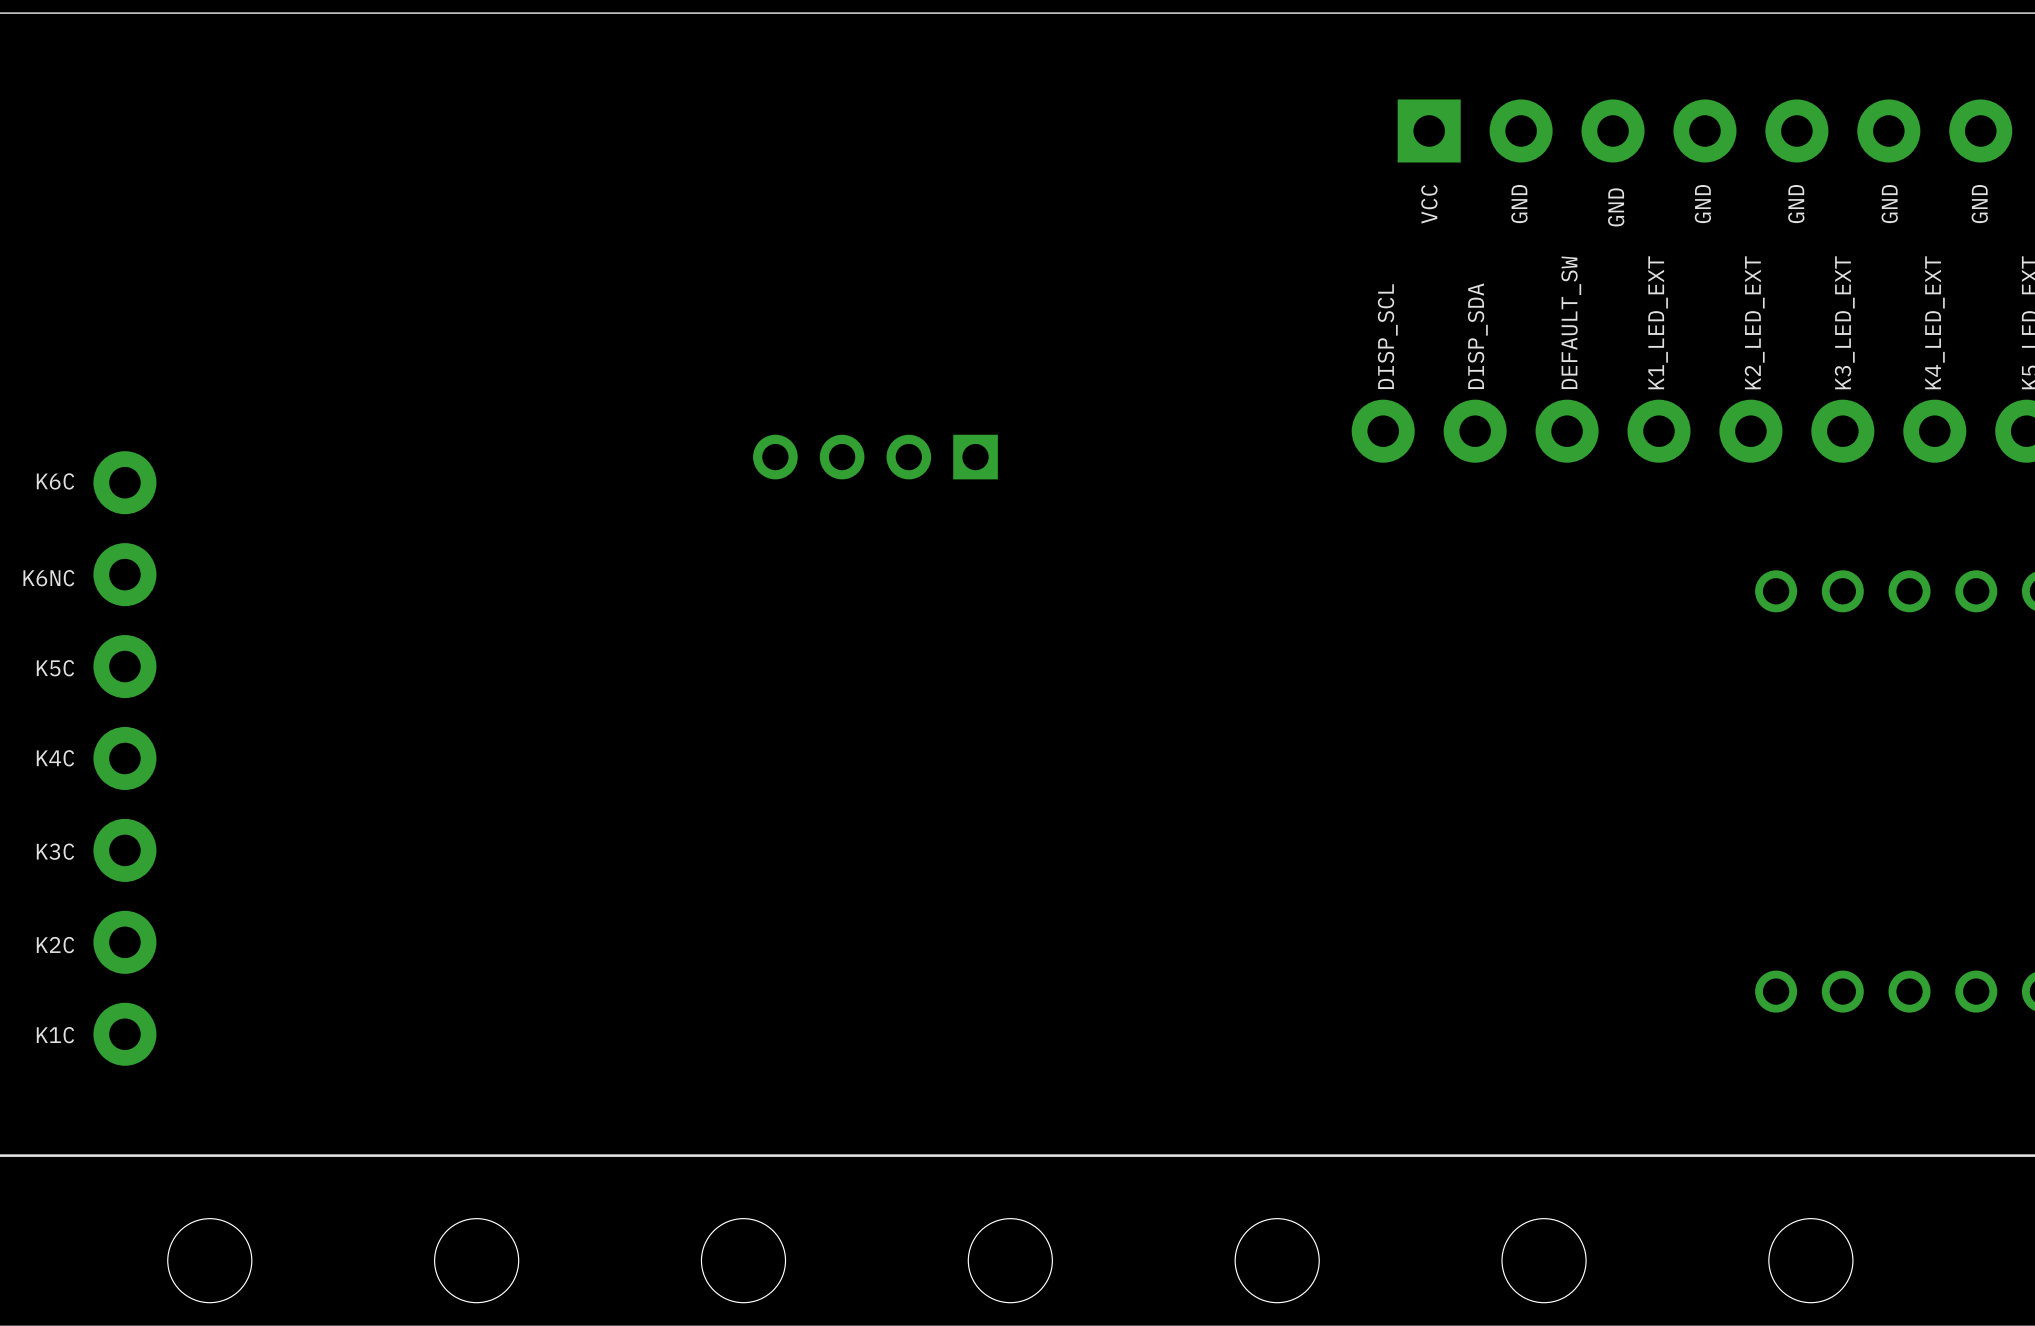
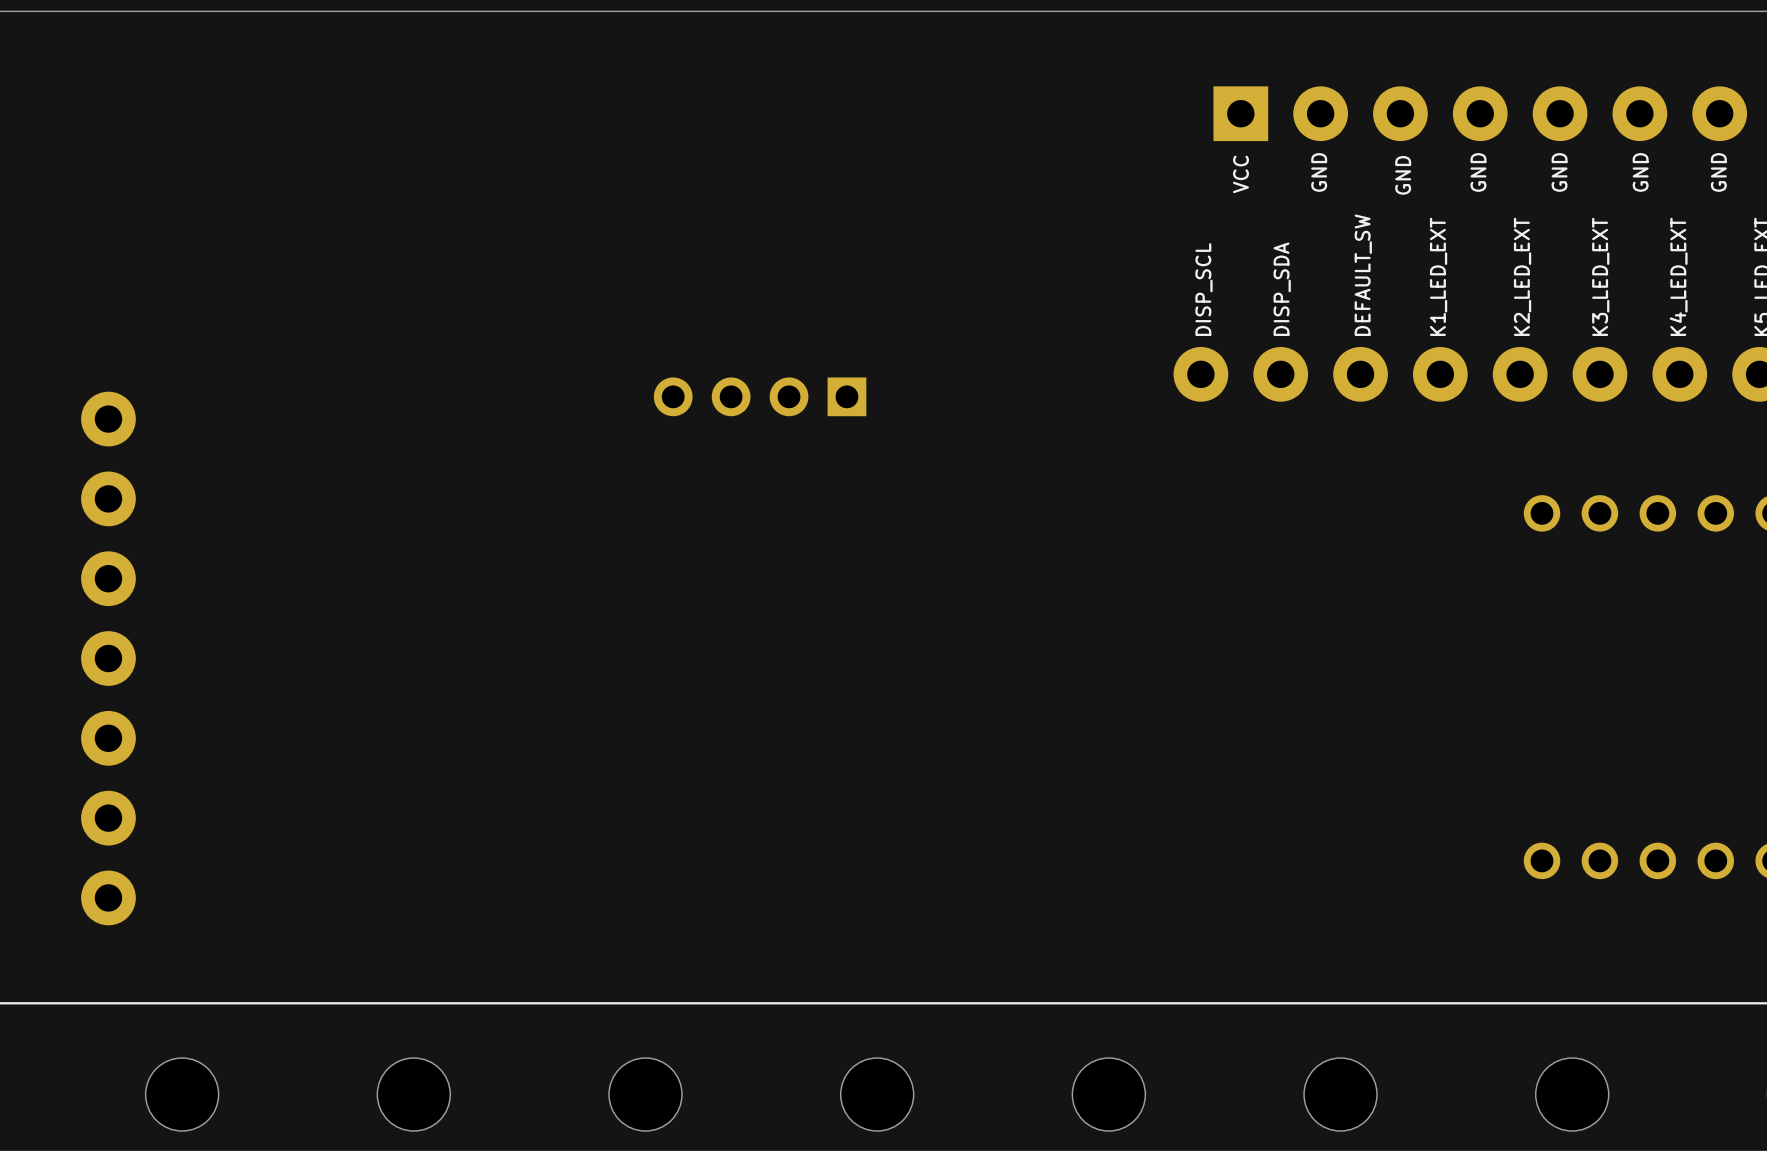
text: K6C (55, 481) -> none
text: K6NC (48, 578) -> none
text: K5C (55, 668) -> none
text: K4C (55, 758) -> none
text: K3C (55, 851) -> none
text: K2C (55, 945) -> none
text: K1C (55, 1035) -> none

